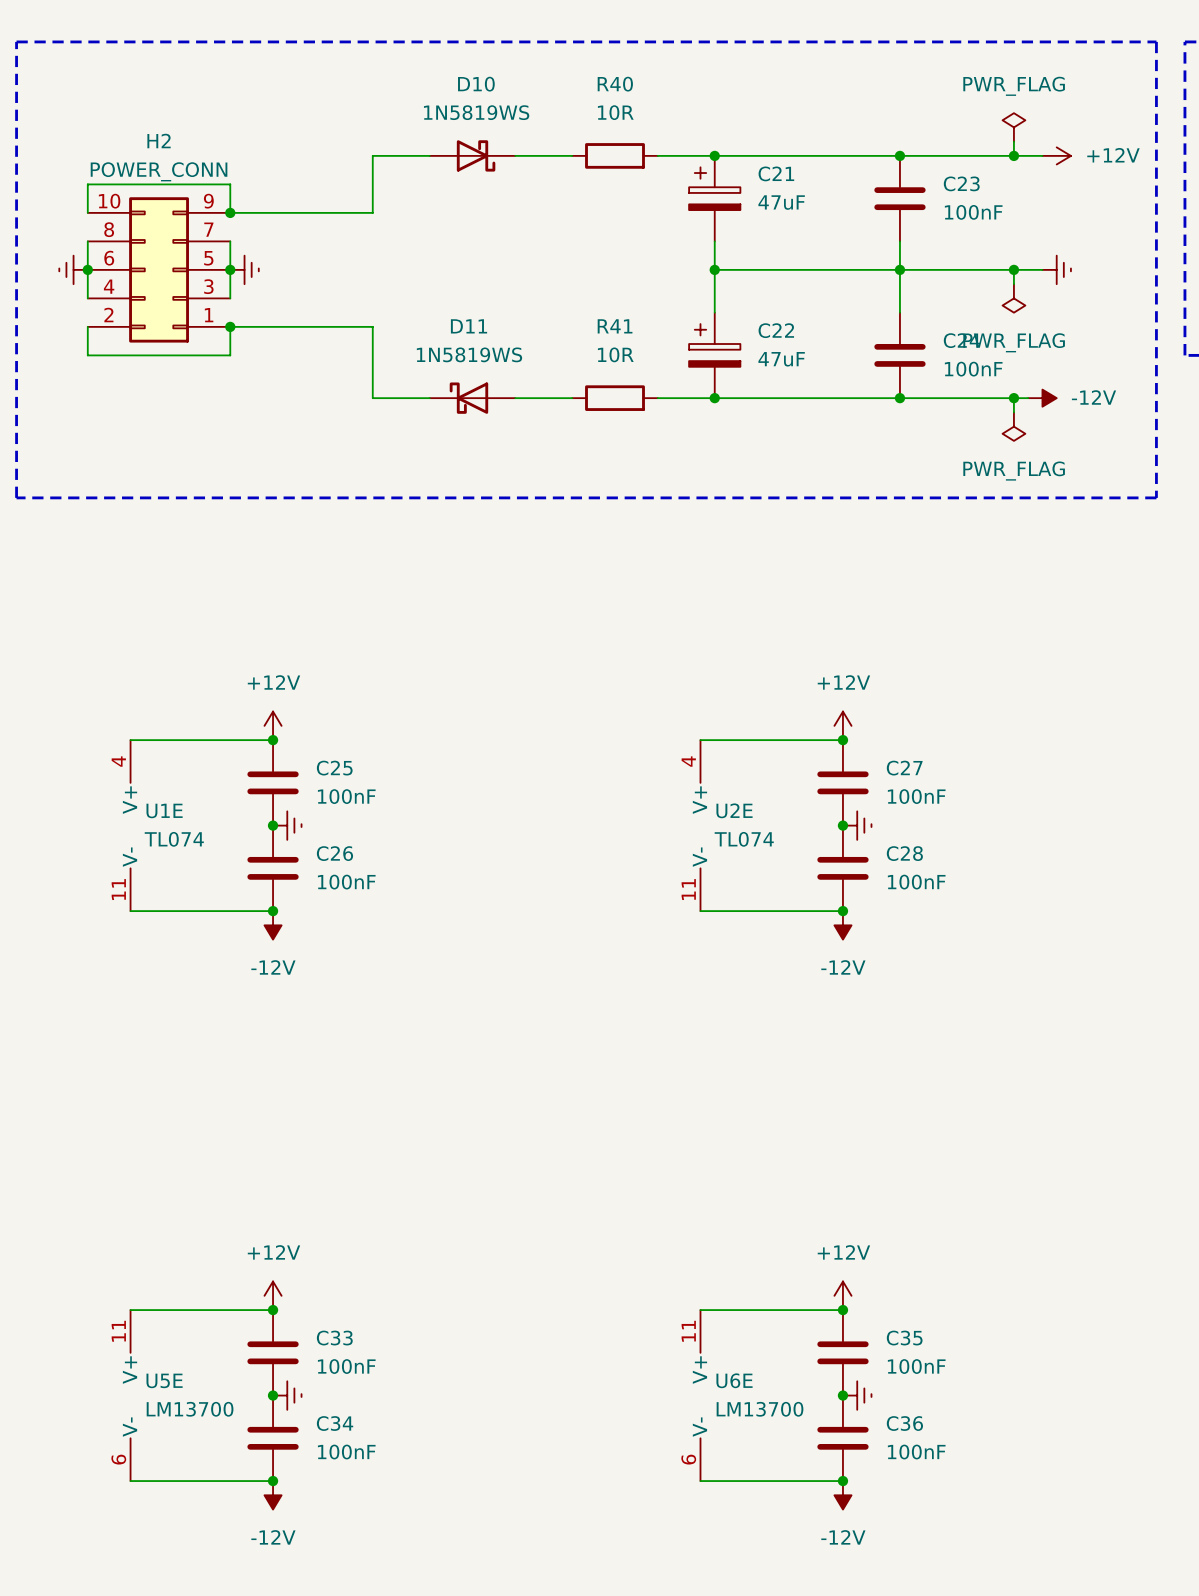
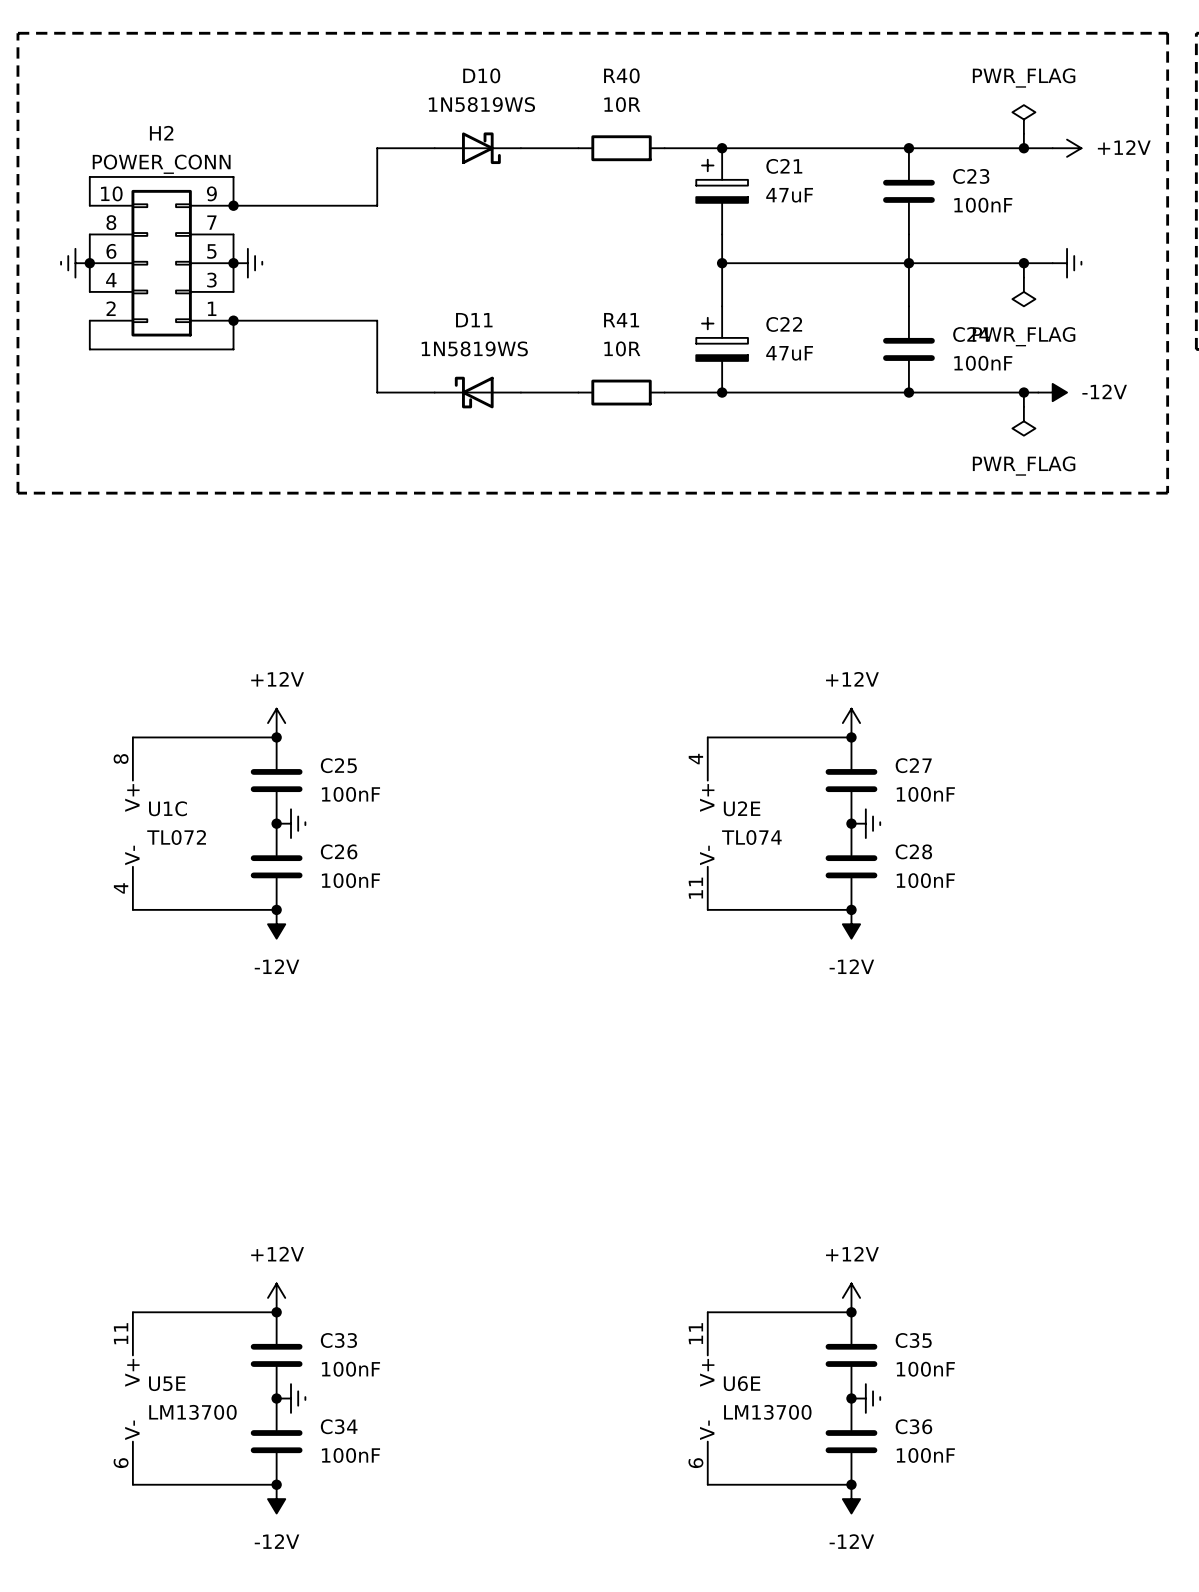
U1E pin number: 4 (118, 761) -> 8 (121, 759)
U1E name: U1E (164, 810) -> U1C (167, 808)
U1E value: TL074 (174, 839) -> TL072 (176, 837)
U1E pin number: 11 (118, 889) -> 4 (121, 888)

